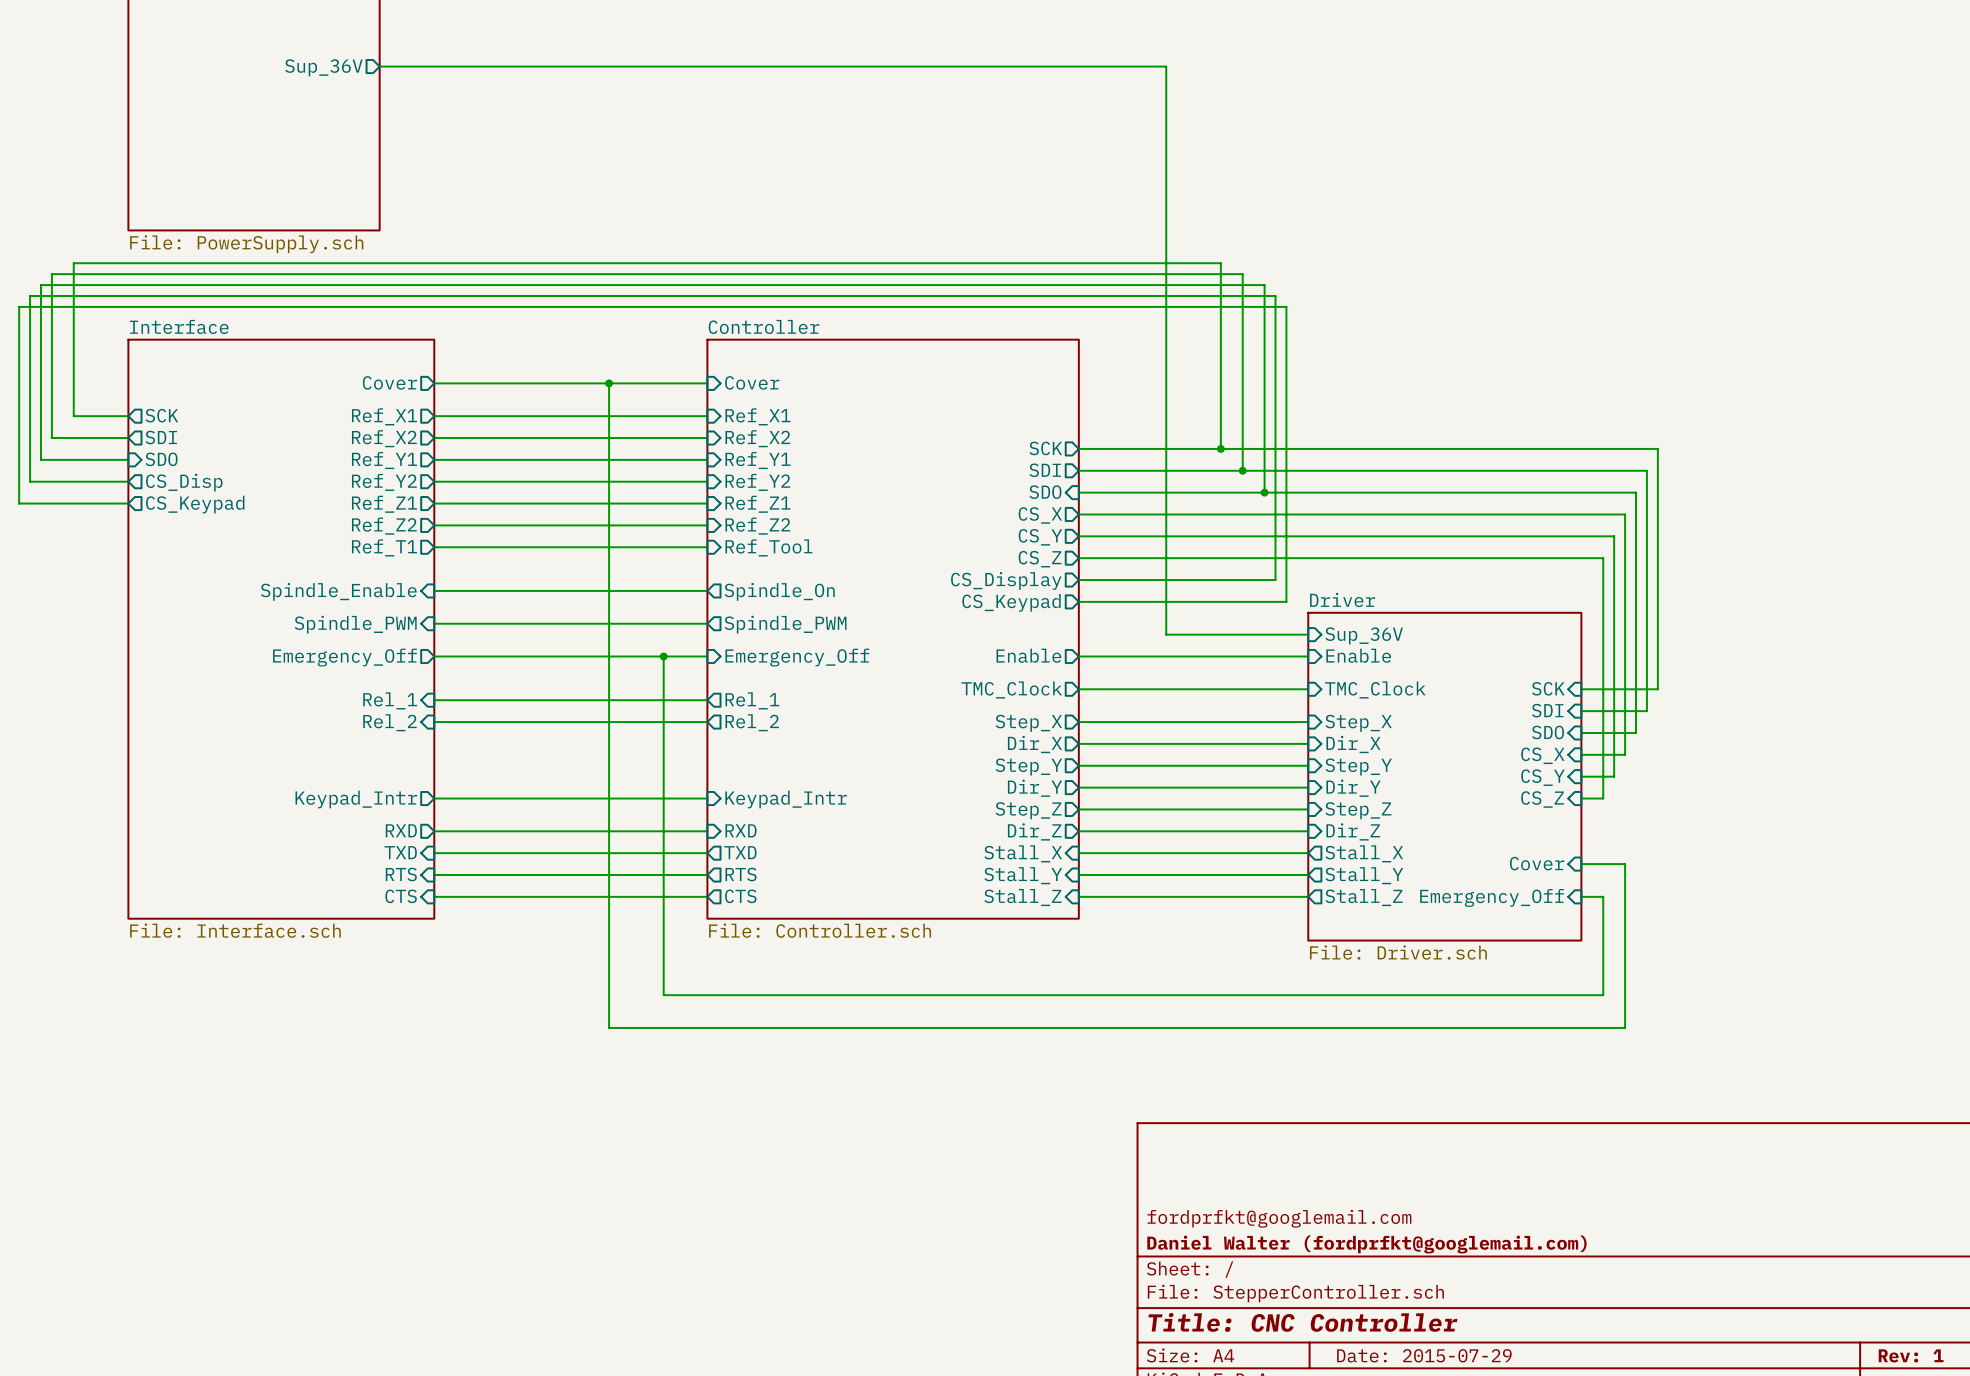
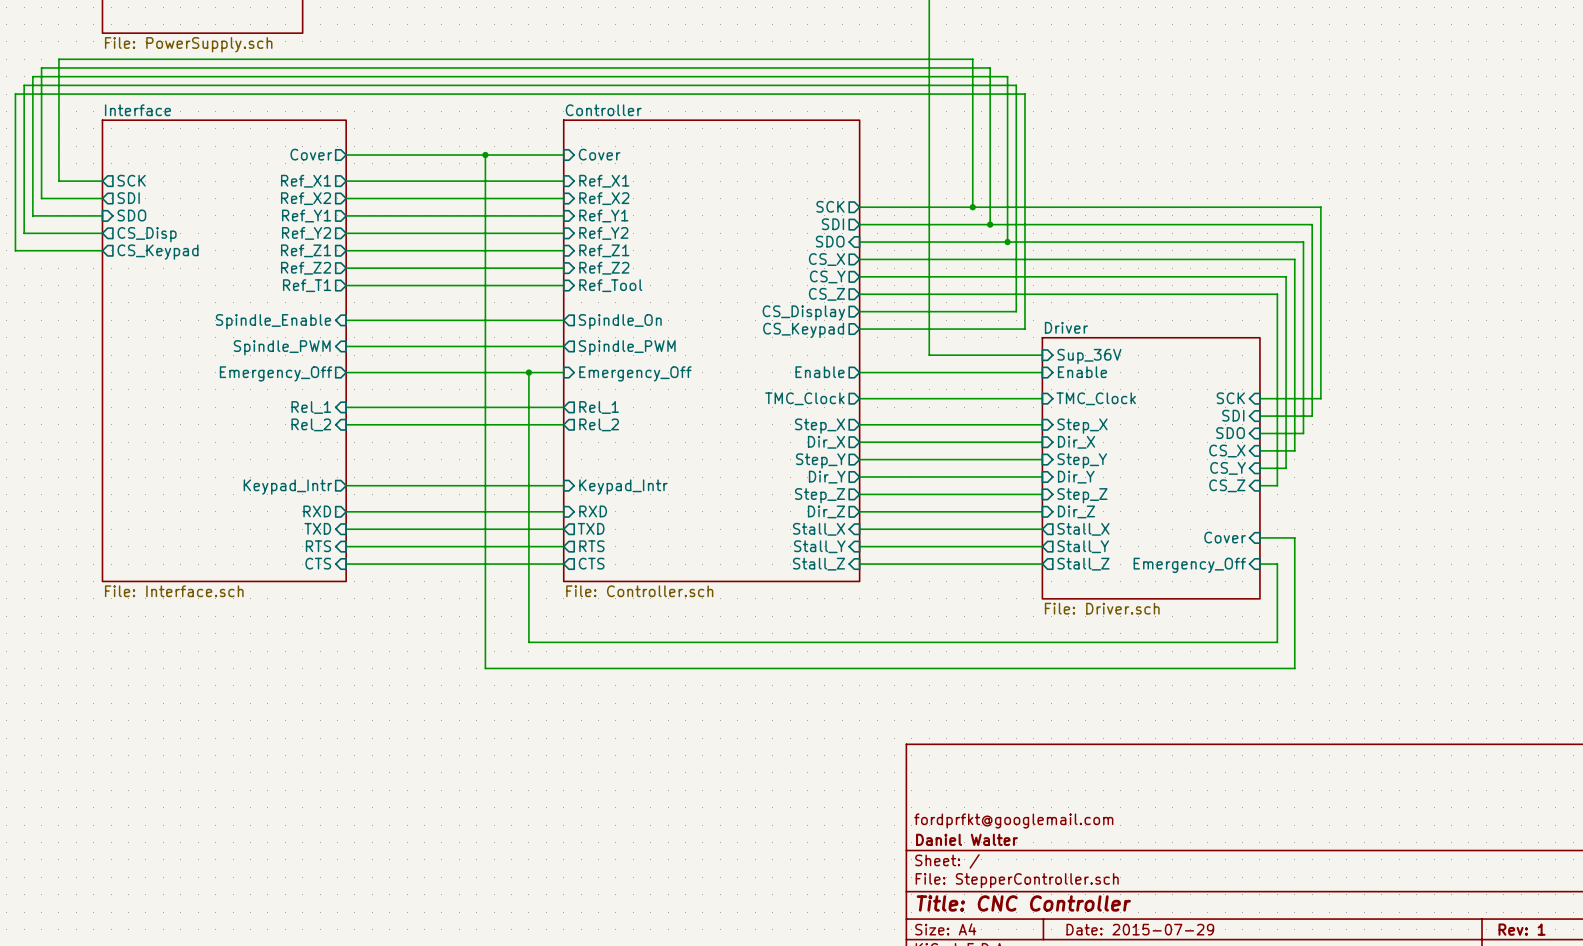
title block: Daniel Walter (fordprfkt@googlemail.com) (1366, 1244) -> Daniel Walter (966, 839)

